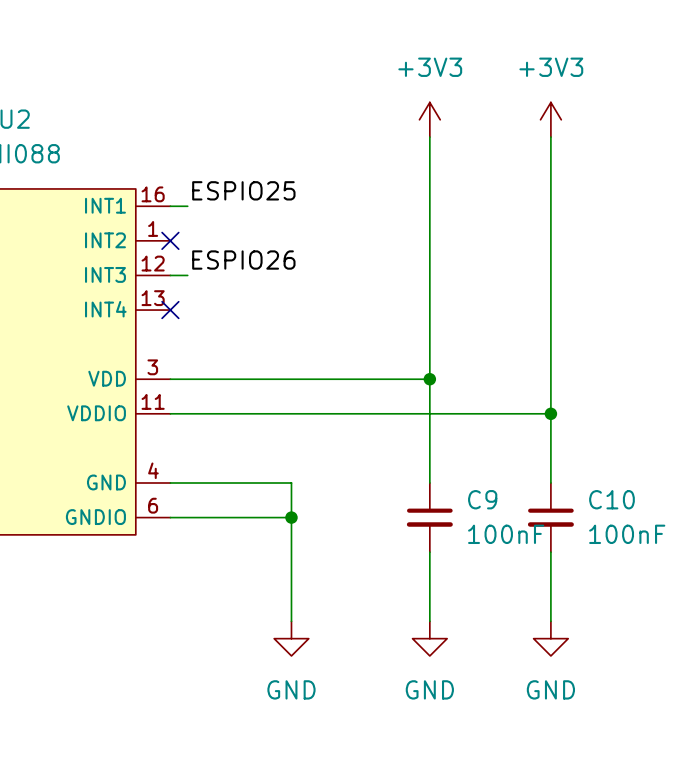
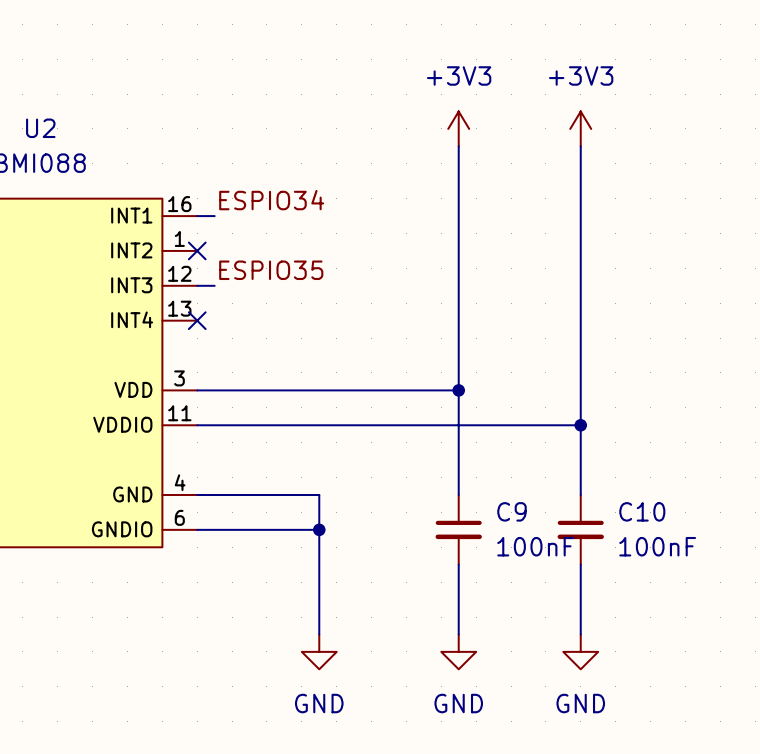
label: ESPIO25 (243, 190) -> ESPIO34 (271, 200)
label: ESPIO26 (243, 260) -> ESPIO35 (271, 270)

